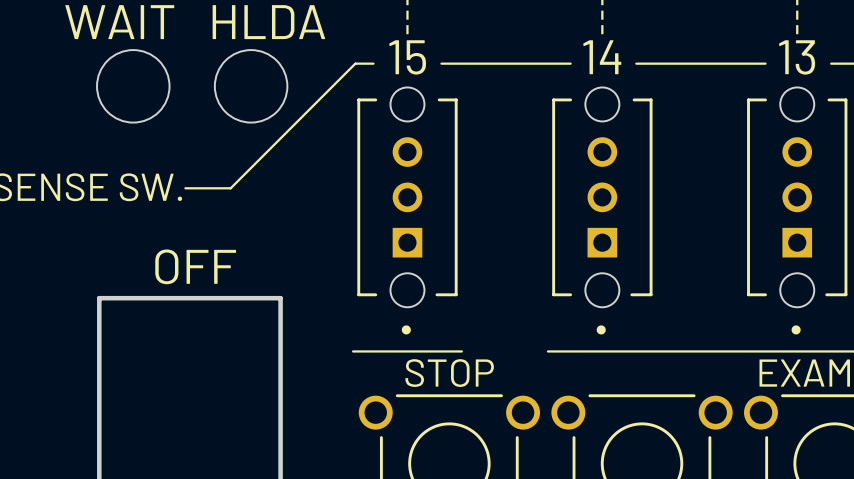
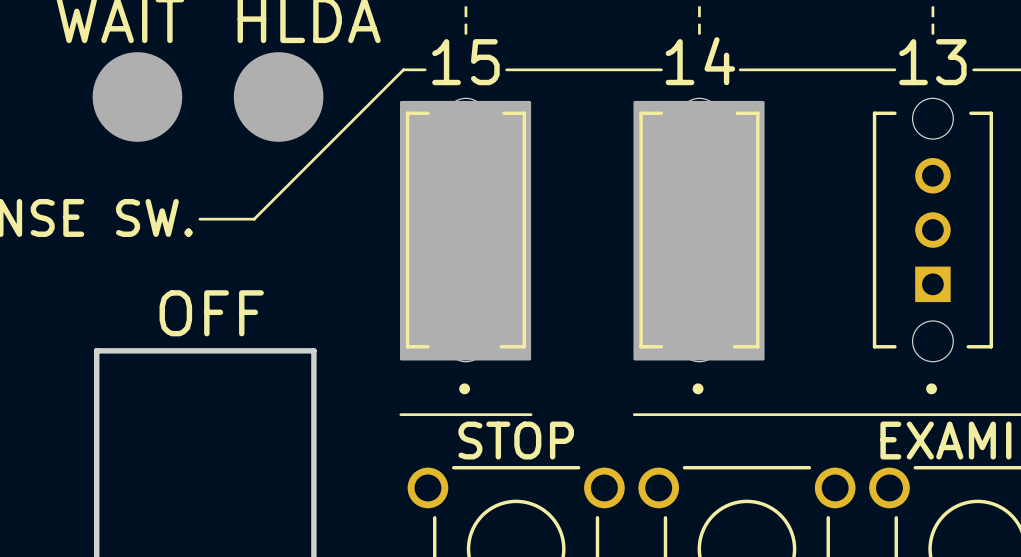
drawing: none -> [92, 52, 183, 142]
drawing: none -> [233, 52, 324, 142]
drawing: none -> [399, 100, 532, 361]
drawing: none -> [633, 100, 765, 361]

